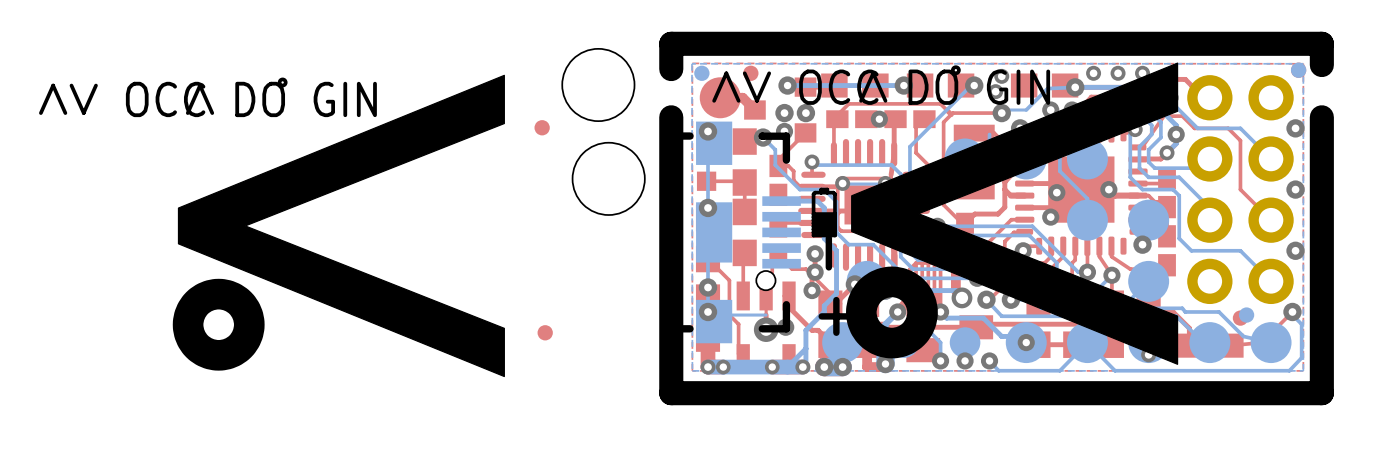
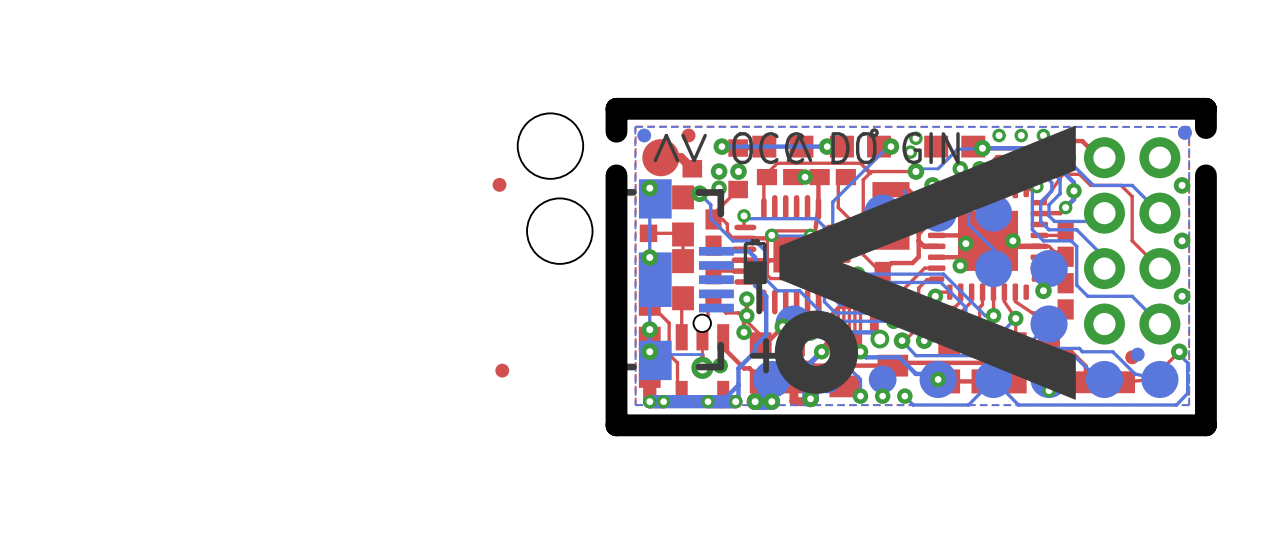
drawing: [172, 74, 505, 378] -> none
line: (95, 85) (83, 113) (71, 85) -> none
text: OCC DO GIN (251, 99) -> none
line: (65, 113) (53, 85) (40, 113) -> none
line: (212, 113) (200, 85) (187, 113) -> none

